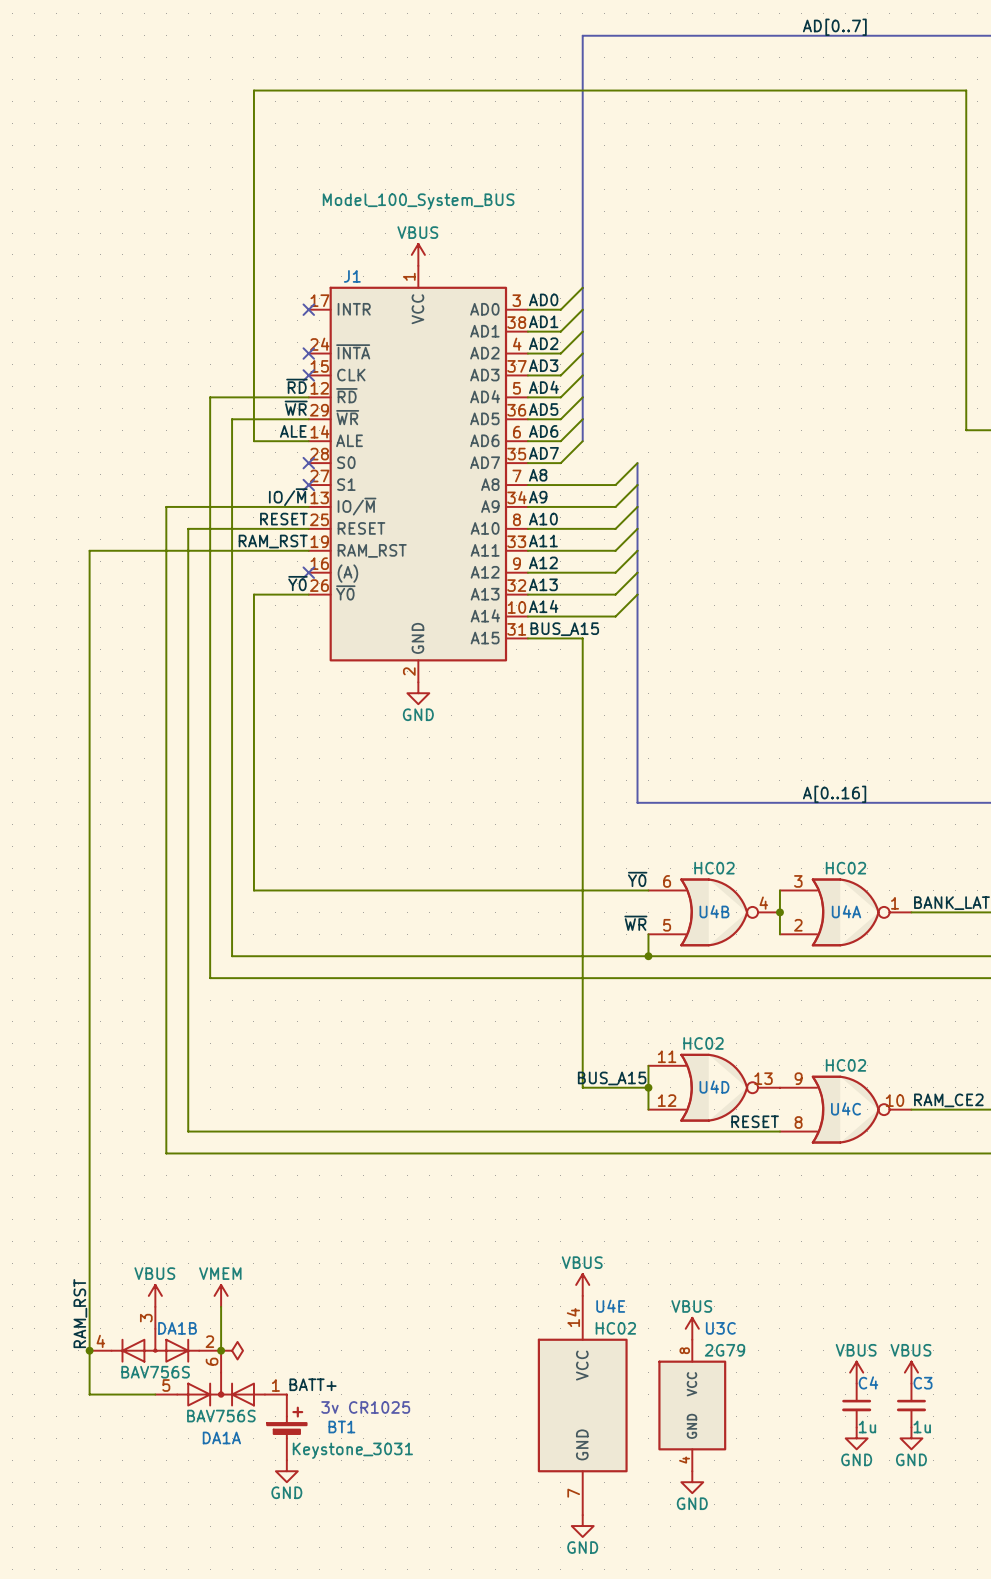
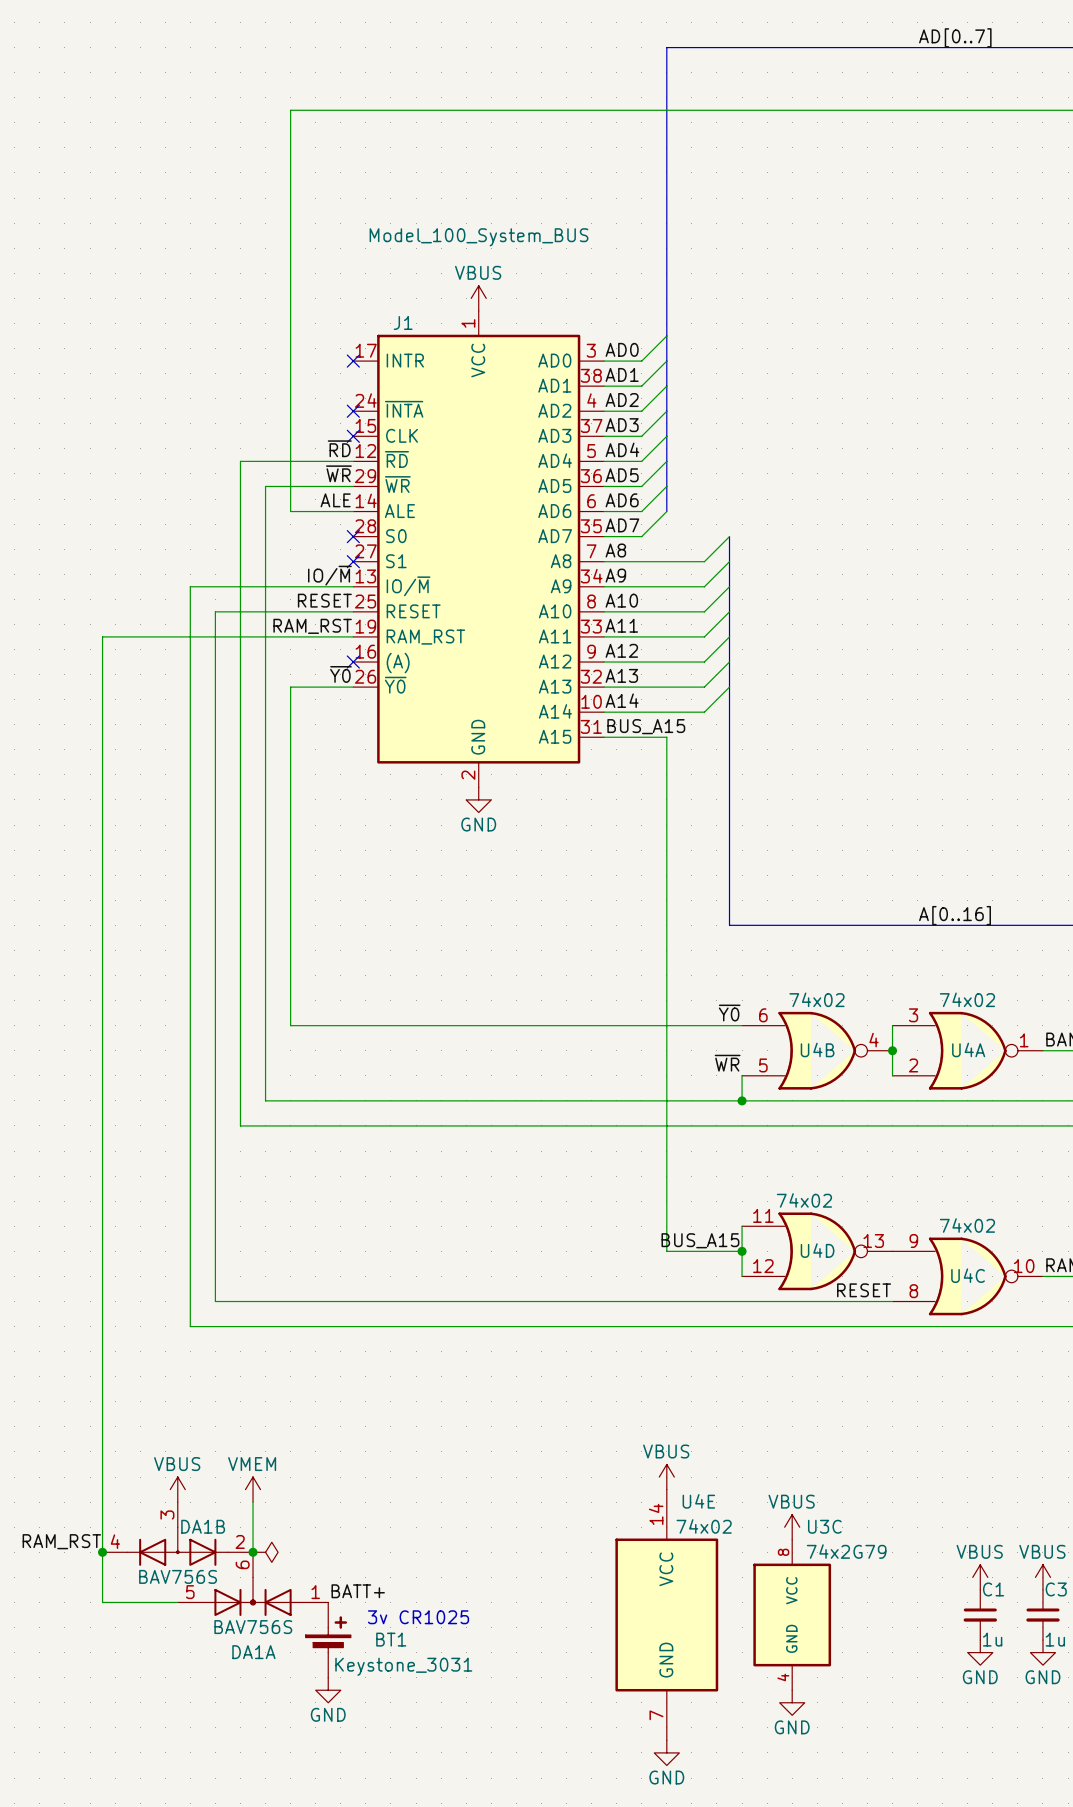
U4B value: HC02 (714, 868) -> 74x02 (816, 999)
U4A value: HC02 (845, 868) -> 74x02 (967, 999)
U4D value: HC02 (703, 1043) -> 74x02 (804, 1200)
U4C value: HC02 (845, 1065) -> 74x02 (967, 1225)
label rotation: 0° (80, 1313) -> 90° clockwise (61, 1541)
U4E value: HC02 (615, 1328) -> 74x02 (704, 1526)
U3C value: 2G79 (724, 1350) -> 74x2G79 (846, 1551)
C4 name: C4 (868, 1382) -> C1 (993, 1589)

